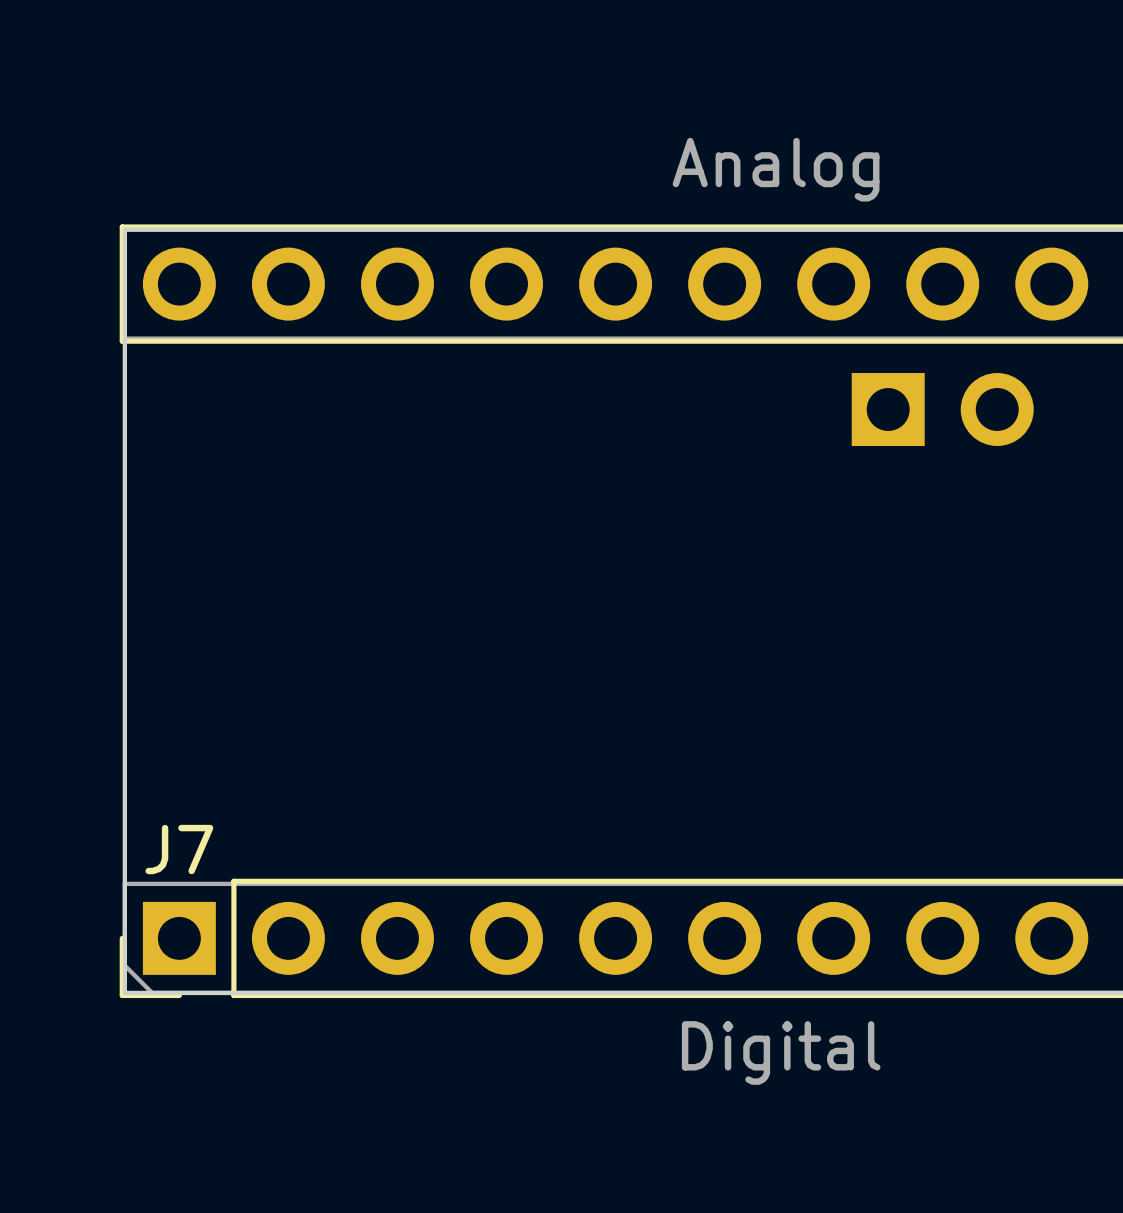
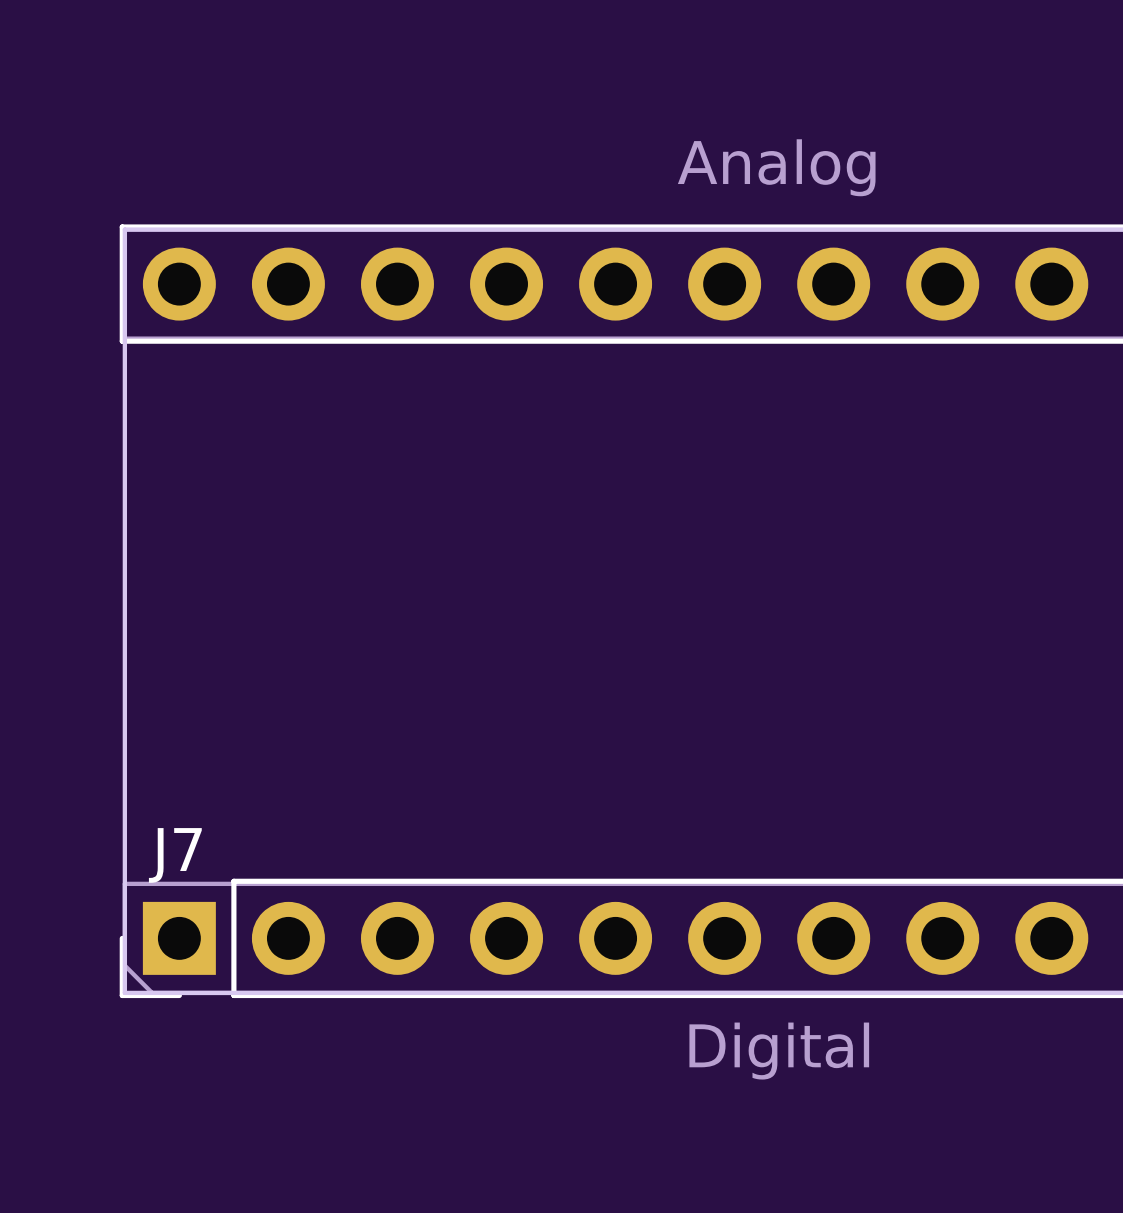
part: (942, 409) -> none

